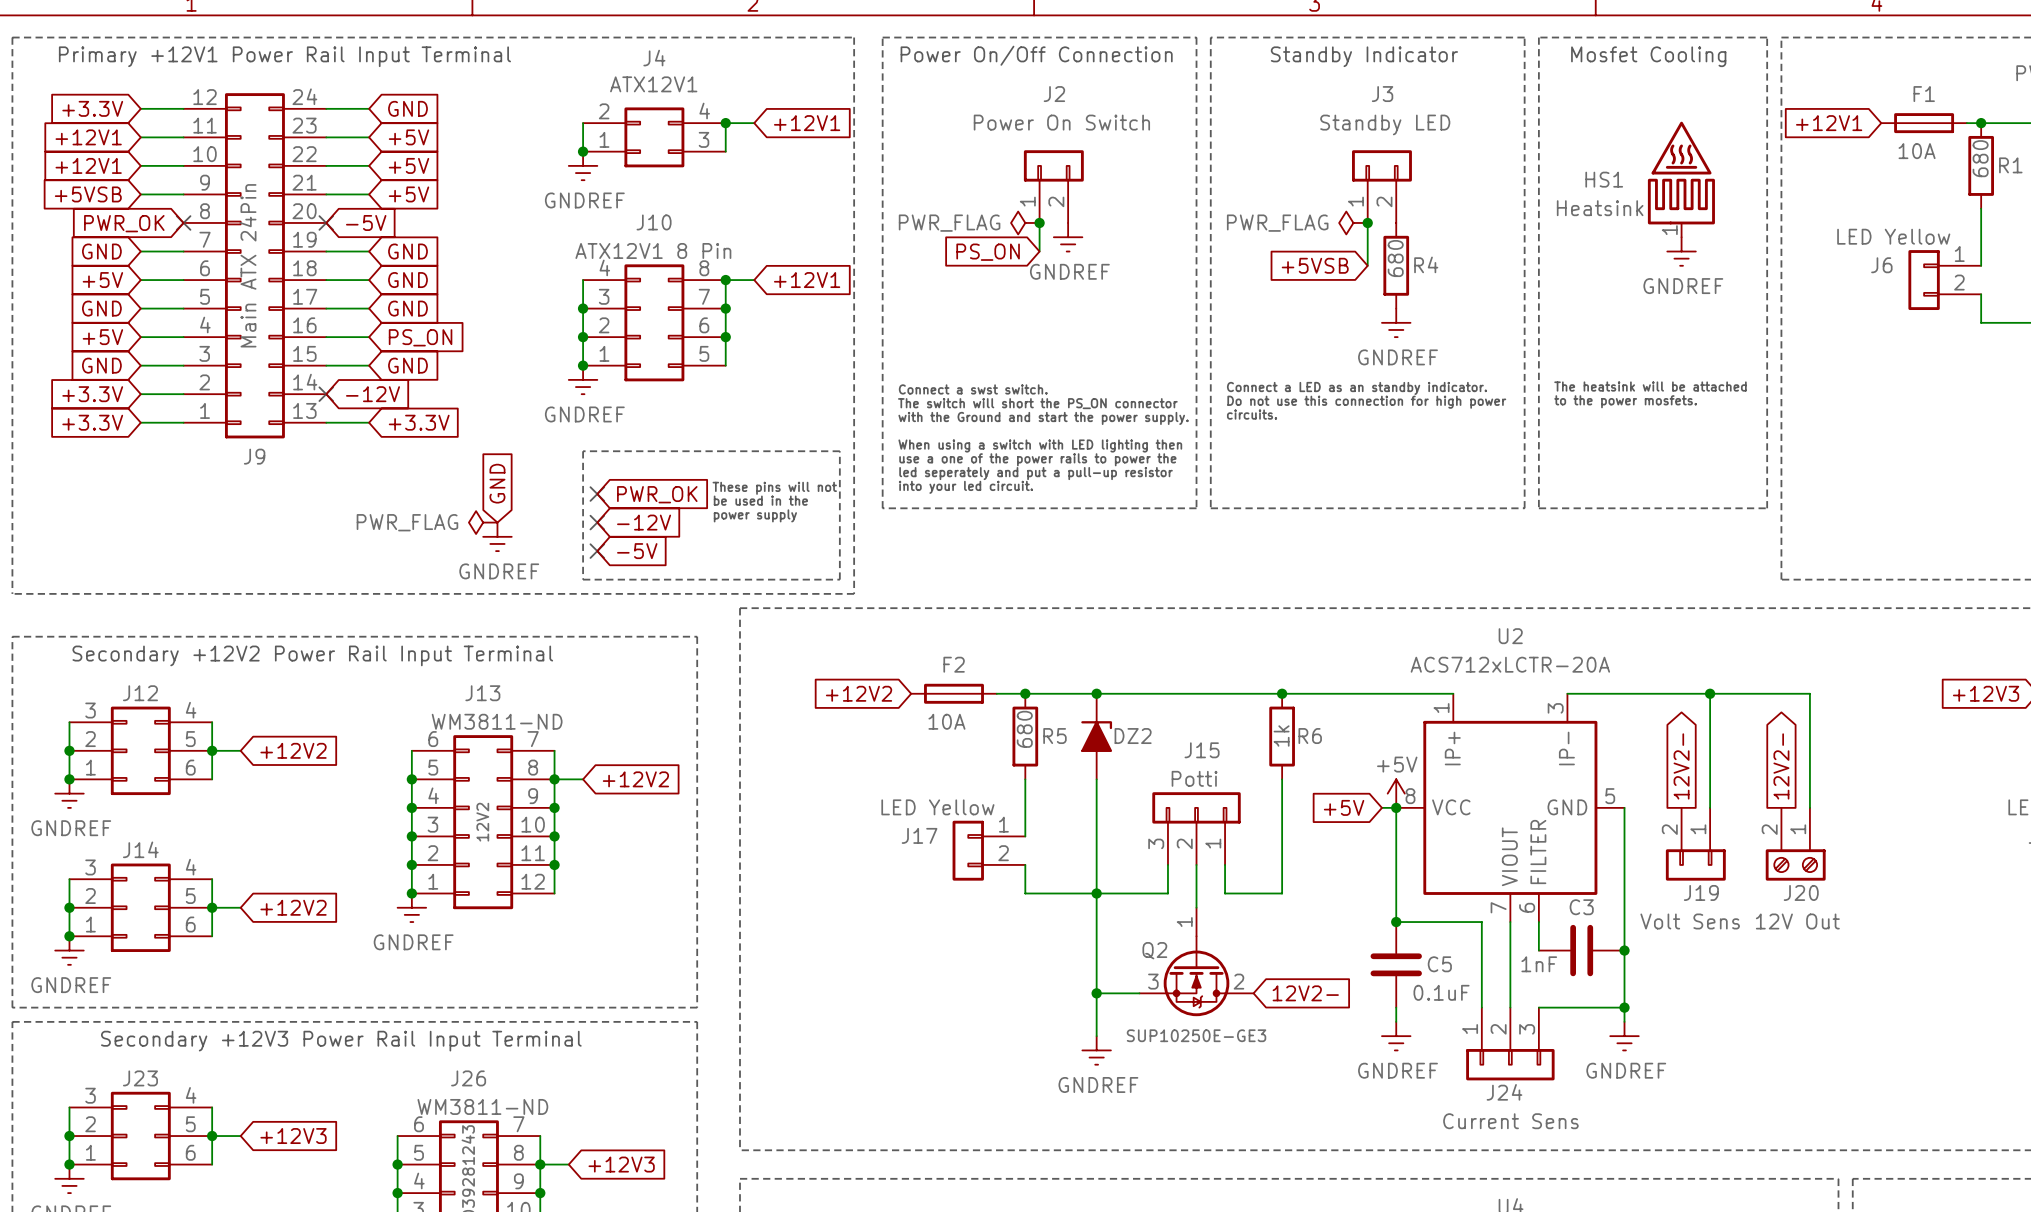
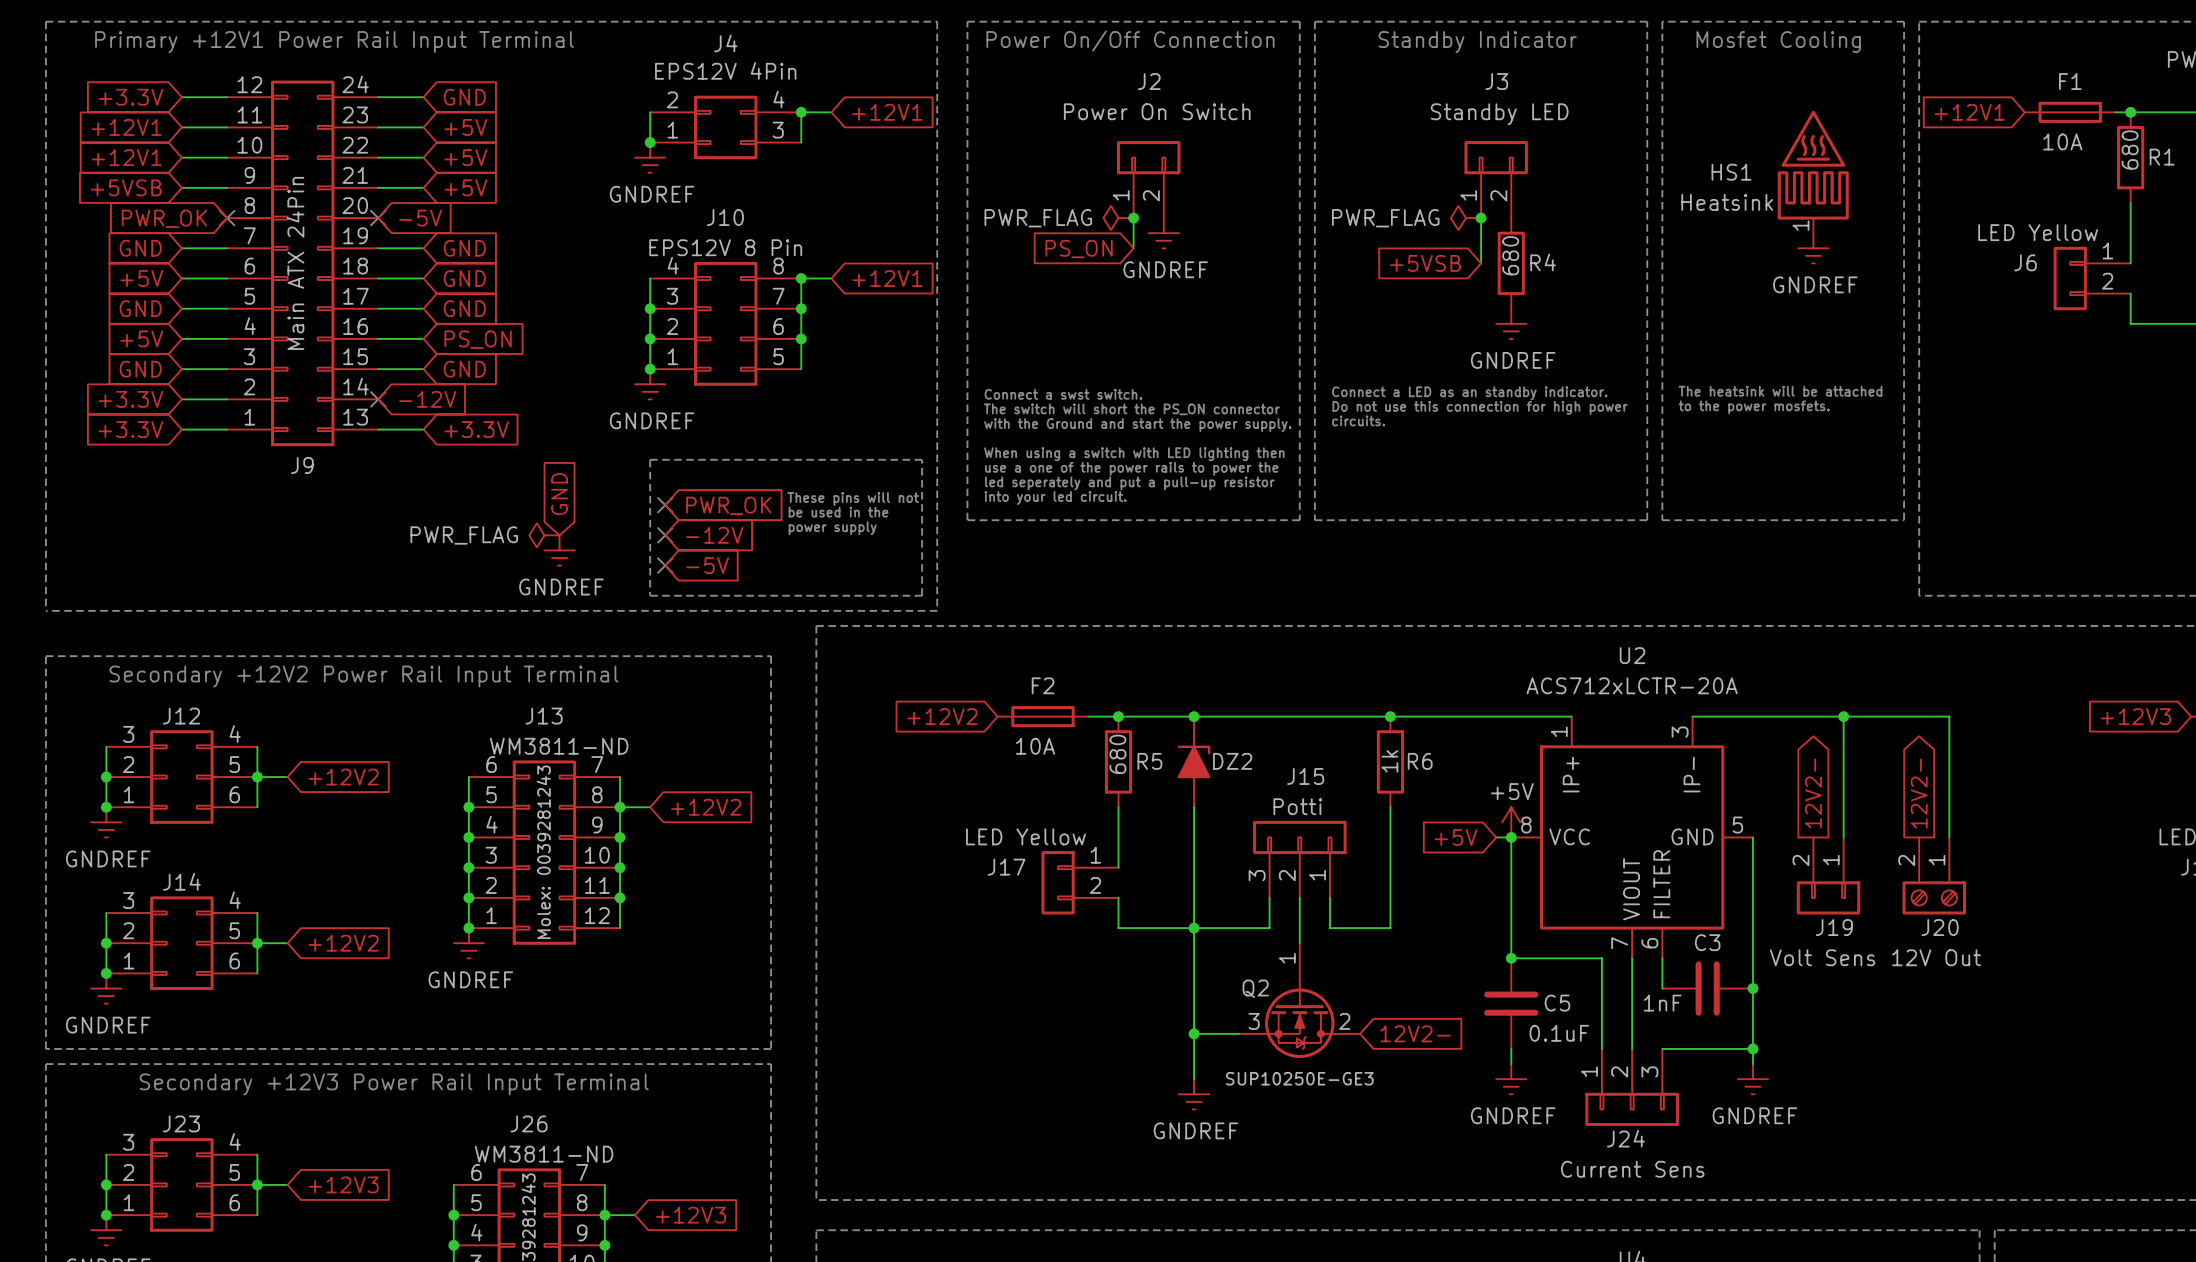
J4 value: ATX12V1 (653, 84) -> EPS12V 4Pin (725, 70)
J10 value: ATX12V1 8 Pin (653, 250) -> EPS12V 8 Pin (725, 247)
J13 value: 12V2 (482, 822) -> Molex: 0039281243 (543, 852)

